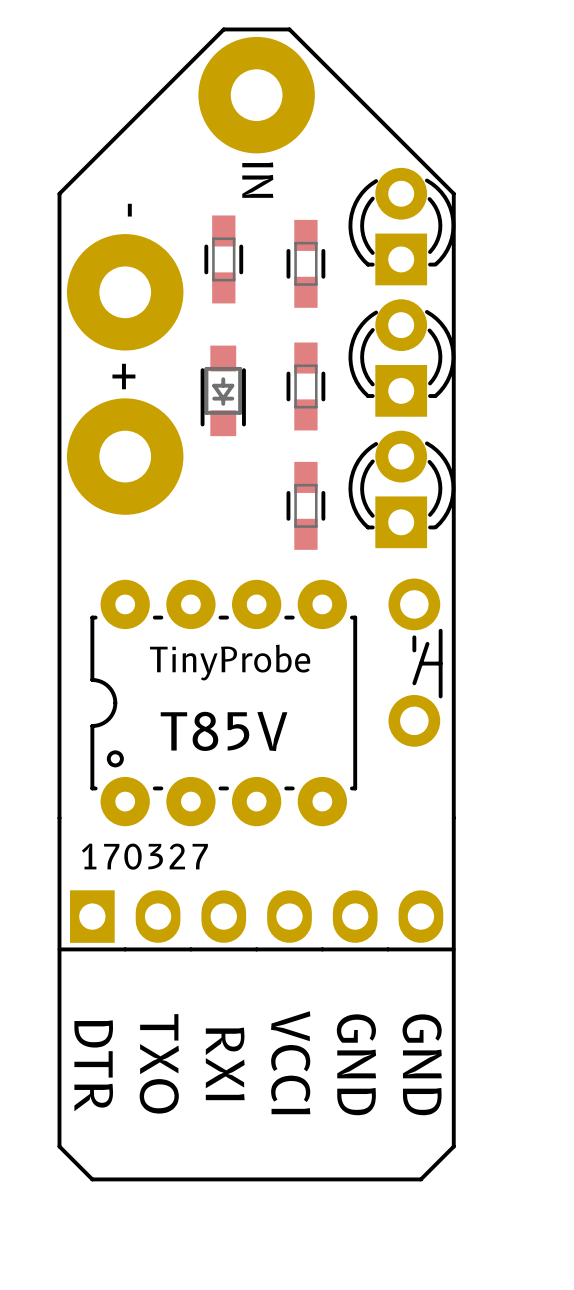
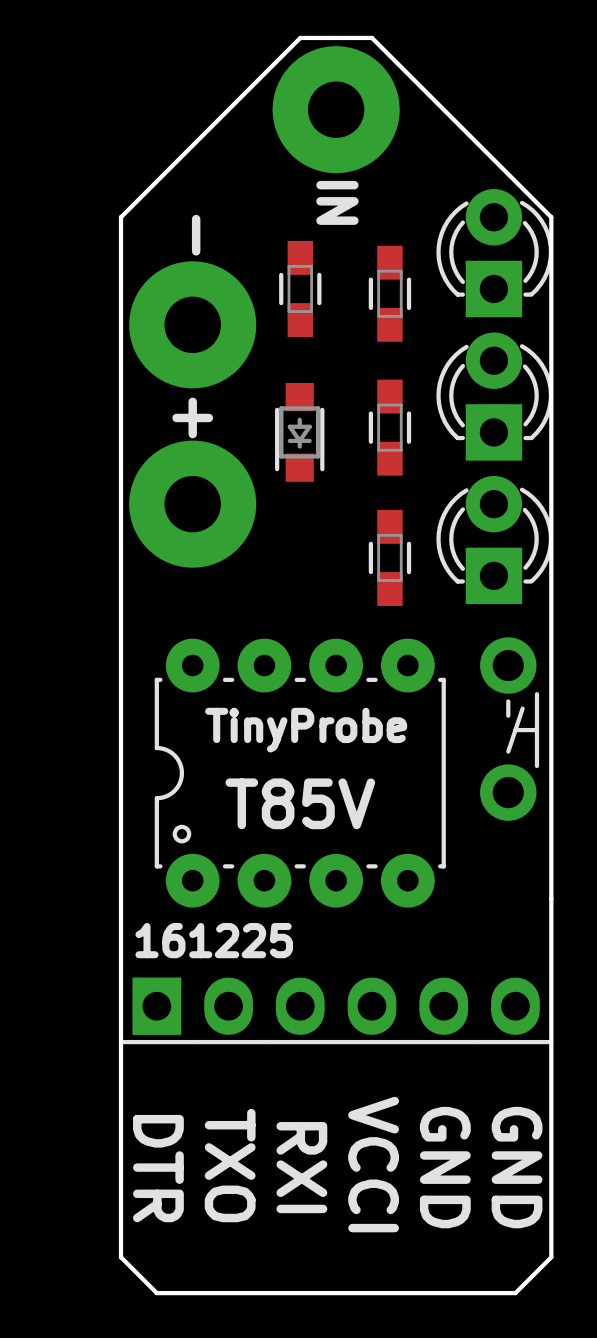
text: 170327 (144, 856) -> 161225 (214, 940)

